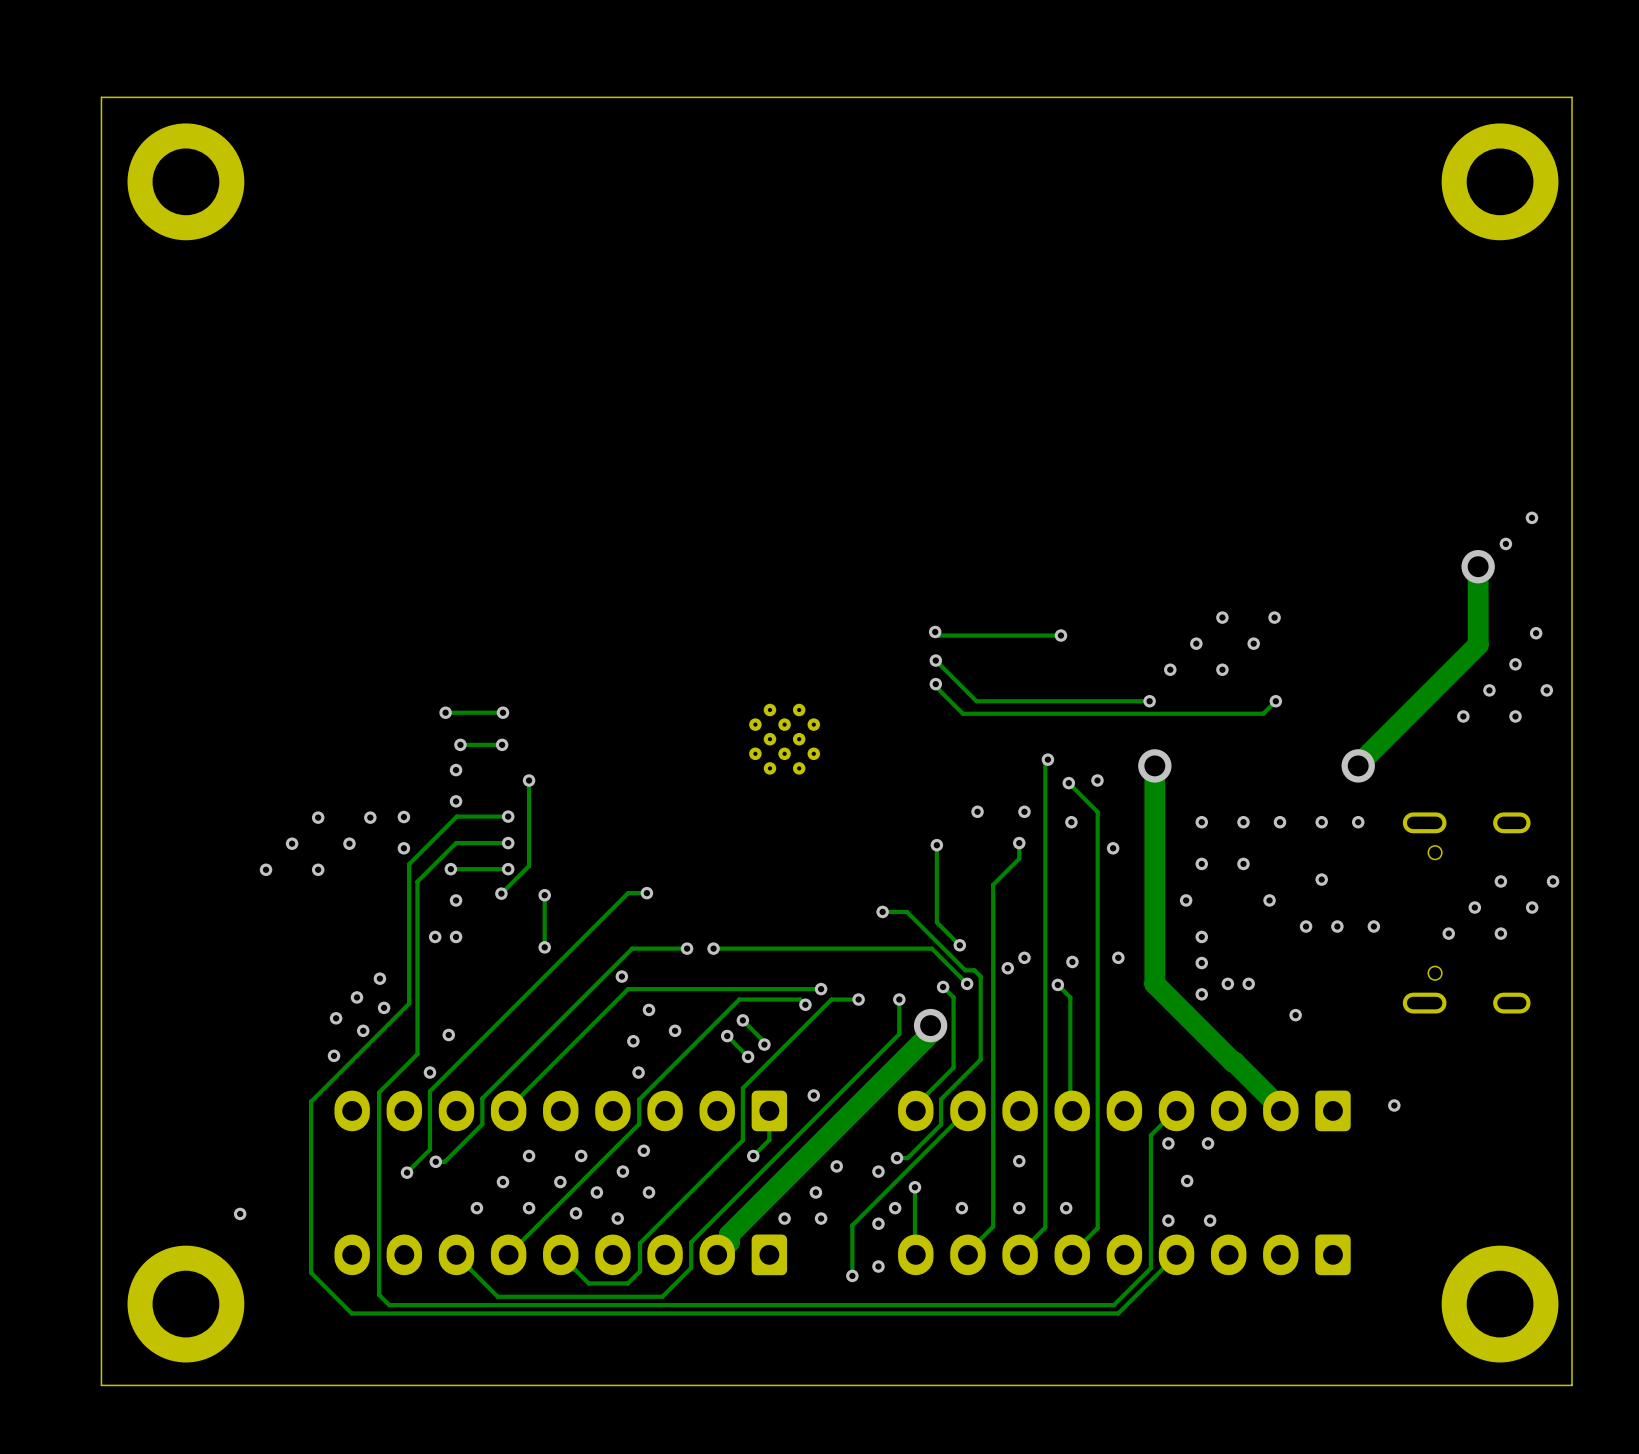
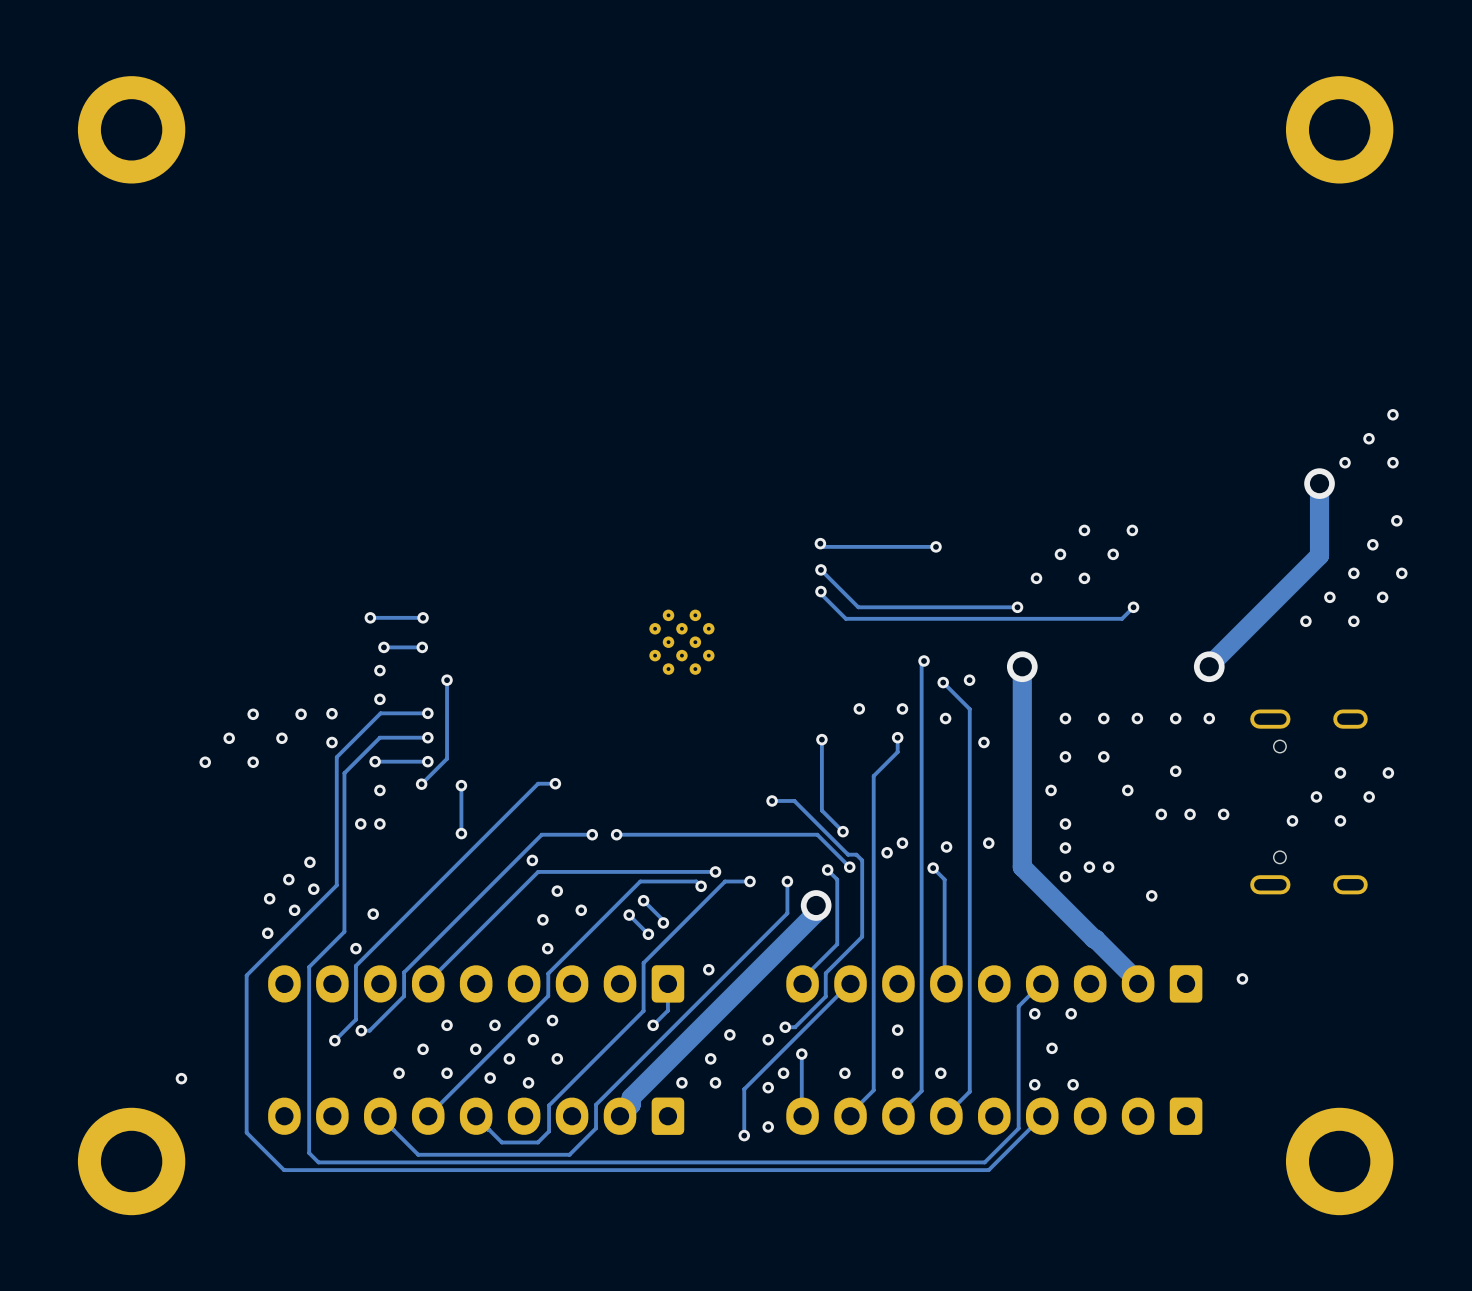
board edge: (1572, 97) (101, 97) (101, 1385) (1572, 1385) (1572, 97) -> none
via: none -> (1392, 414)
via: none -> (1392, 462)
via: none -> (1396, 520)
via: none -> (1401, 573)

